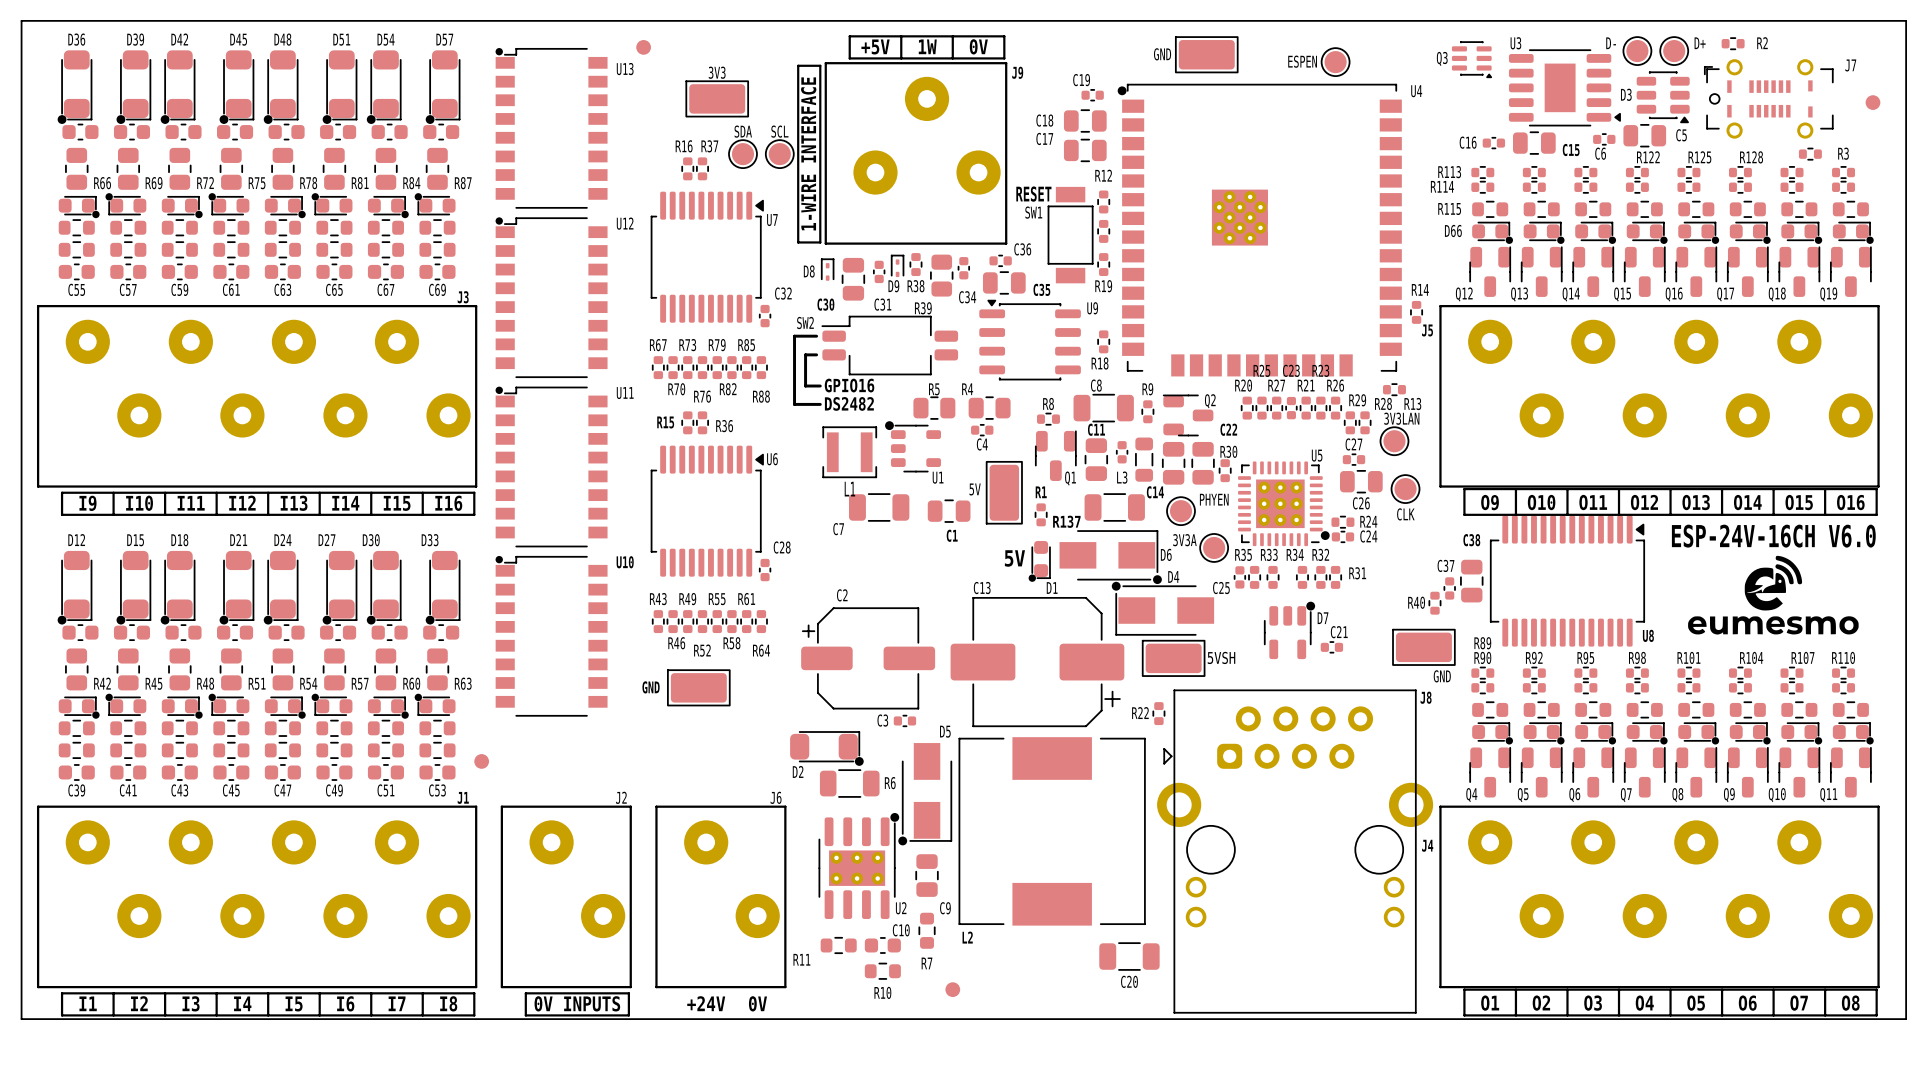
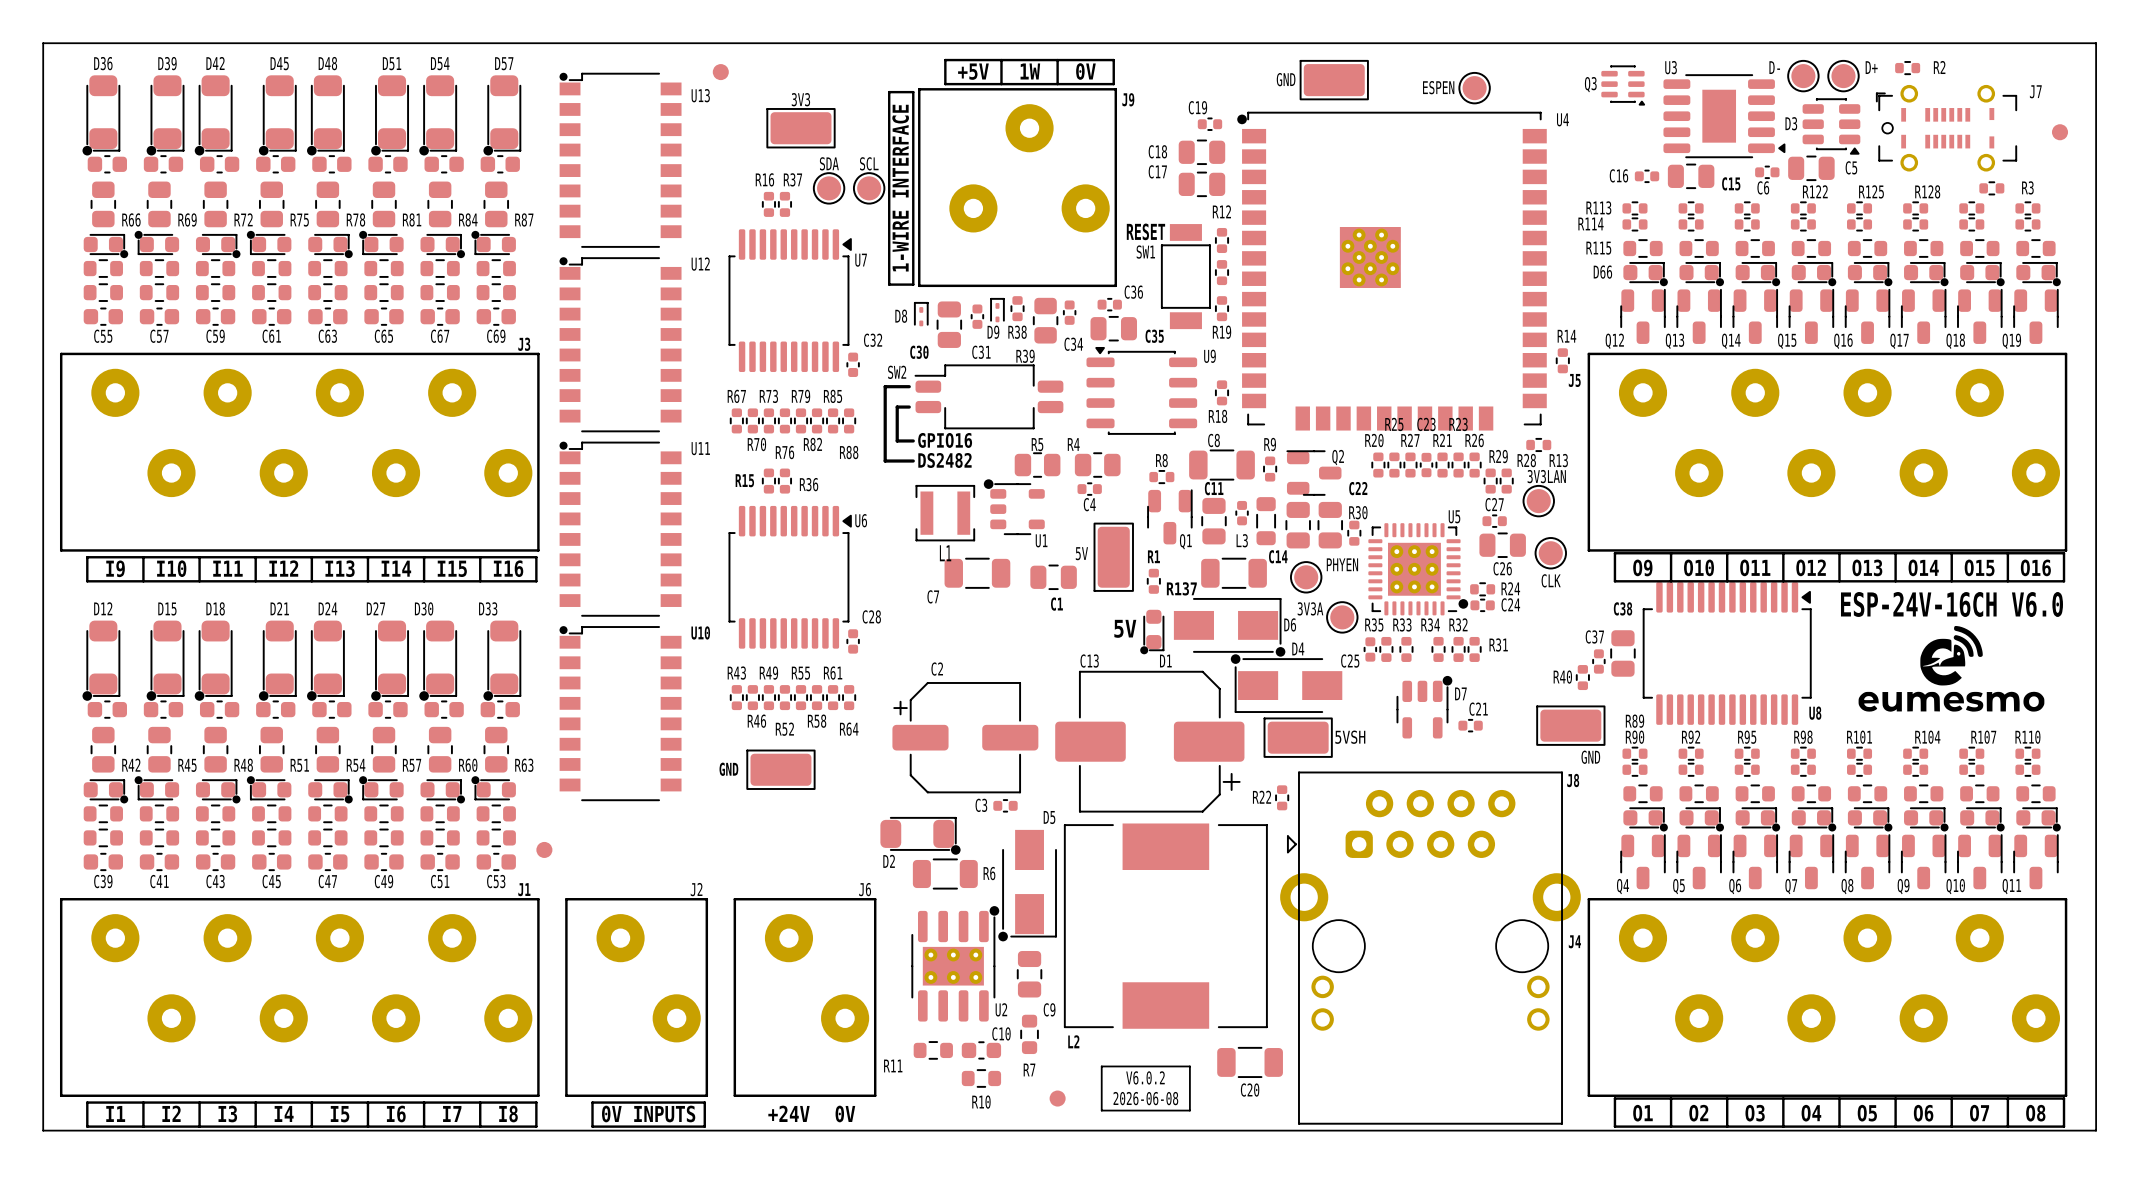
line: none -> (1101, 1066) (1189, 1066) (1189, 1110) (1101, 1110) (1101, 1066)
text: none -> V6.0.2 (1145, 1077)
text: none -> 2026-06-08 (1145, 1098)

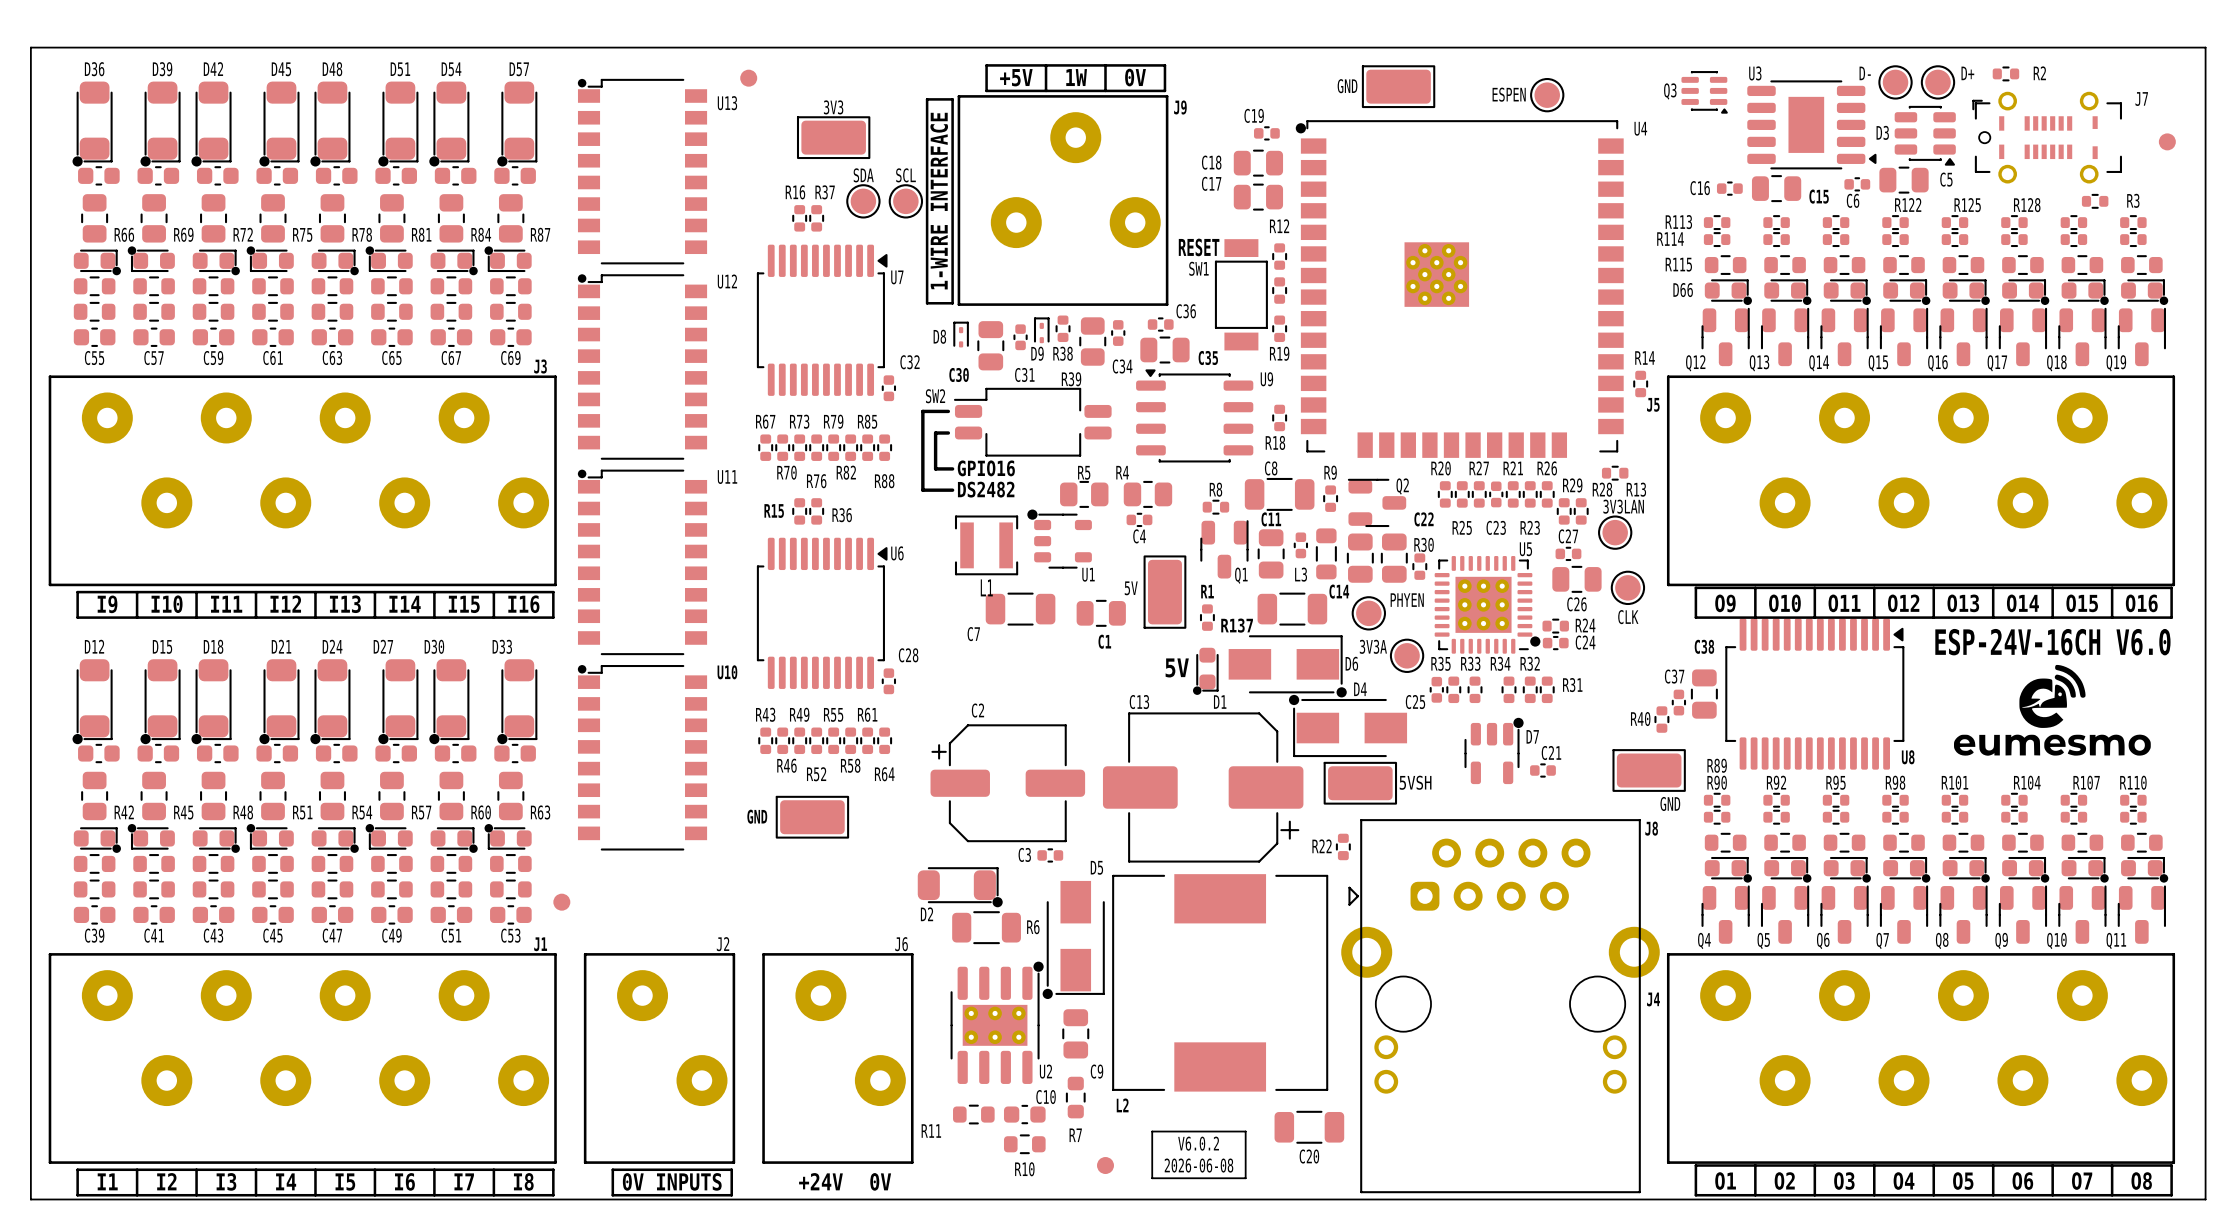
R25 name position: R25 (1394, 424) -> R25 (1462, 527)
C23 name position: C23 (1426, 424) -> C23 (1496, 527)
R23 name position: R23 (1458, 424) -> R23 (1530, 527)

